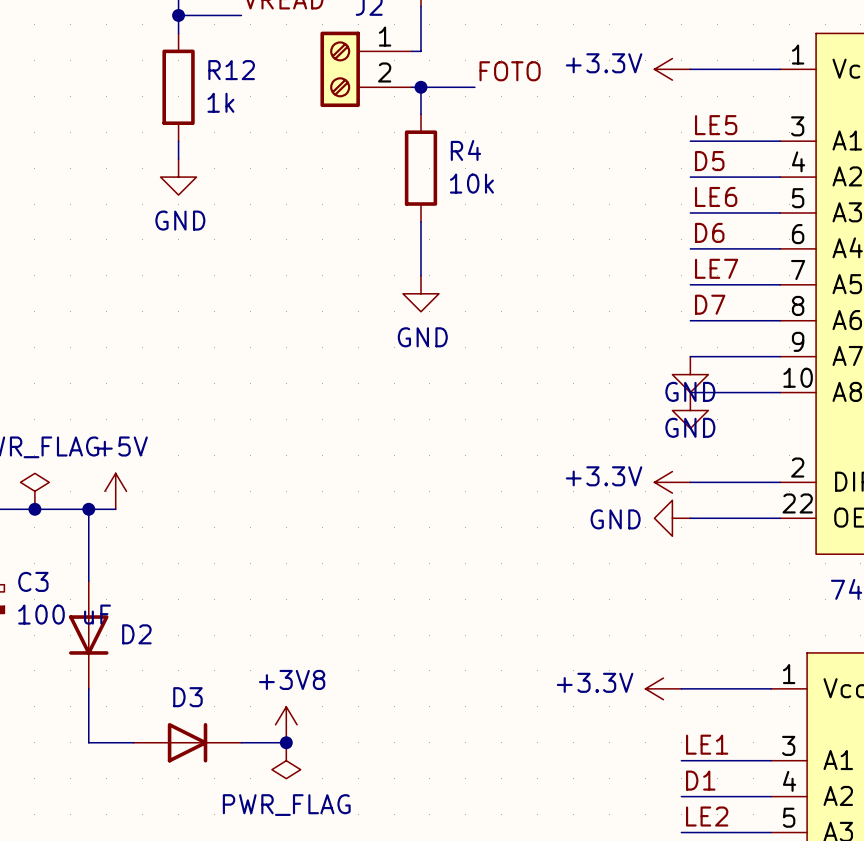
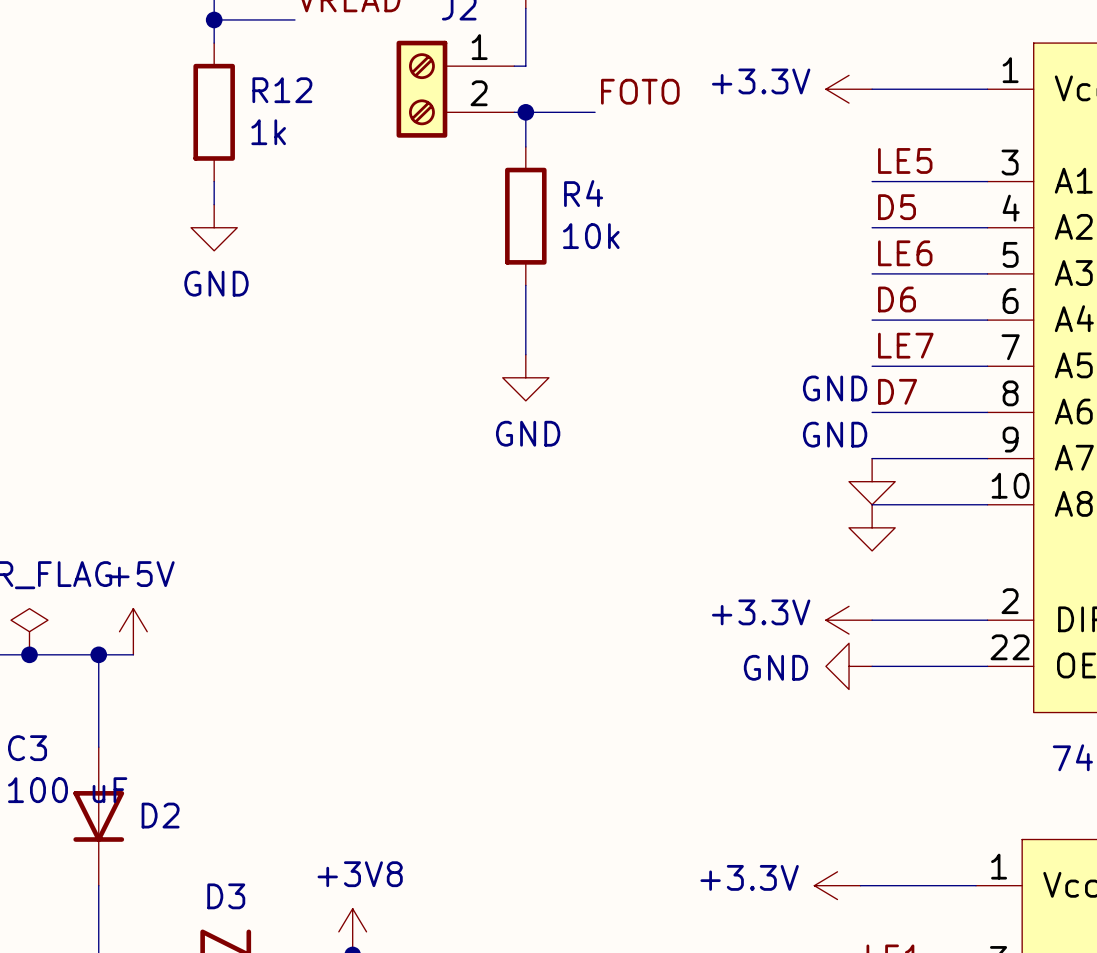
power symbol text position: GND (690, 391) -> GND (835, 388)
power symbol text position: GND (690, 427) -> GND (835, 434)

